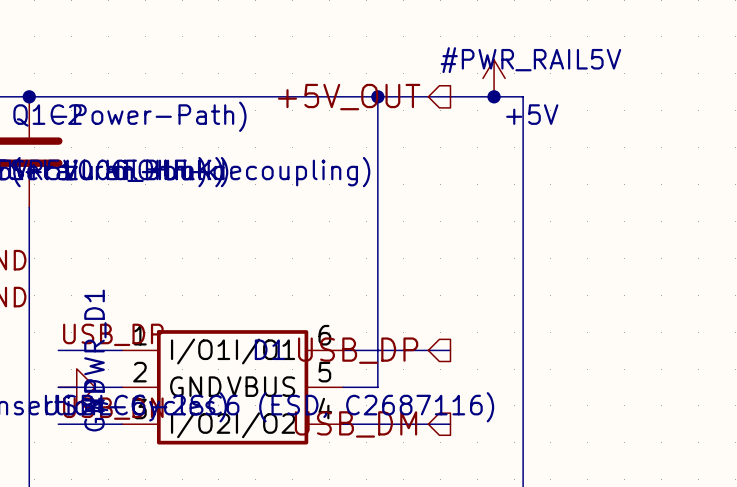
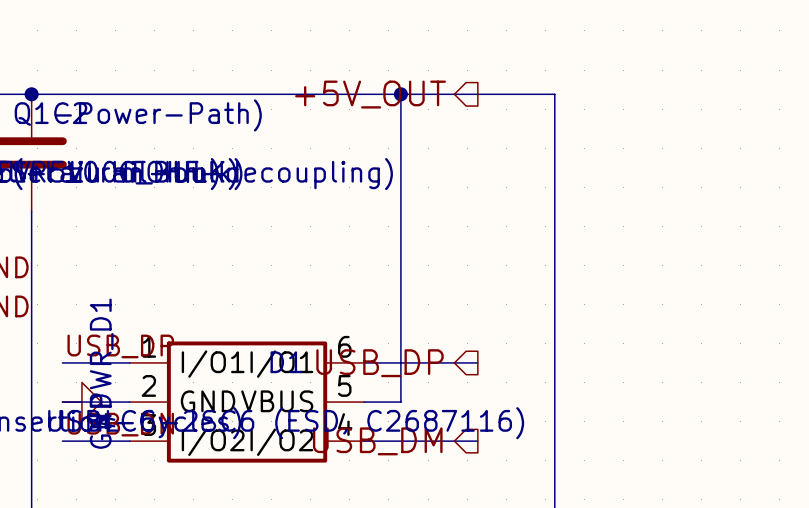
#PWR_RAIL5V: +5V (494, 78) -> none
junction: (494, 96) -> none

